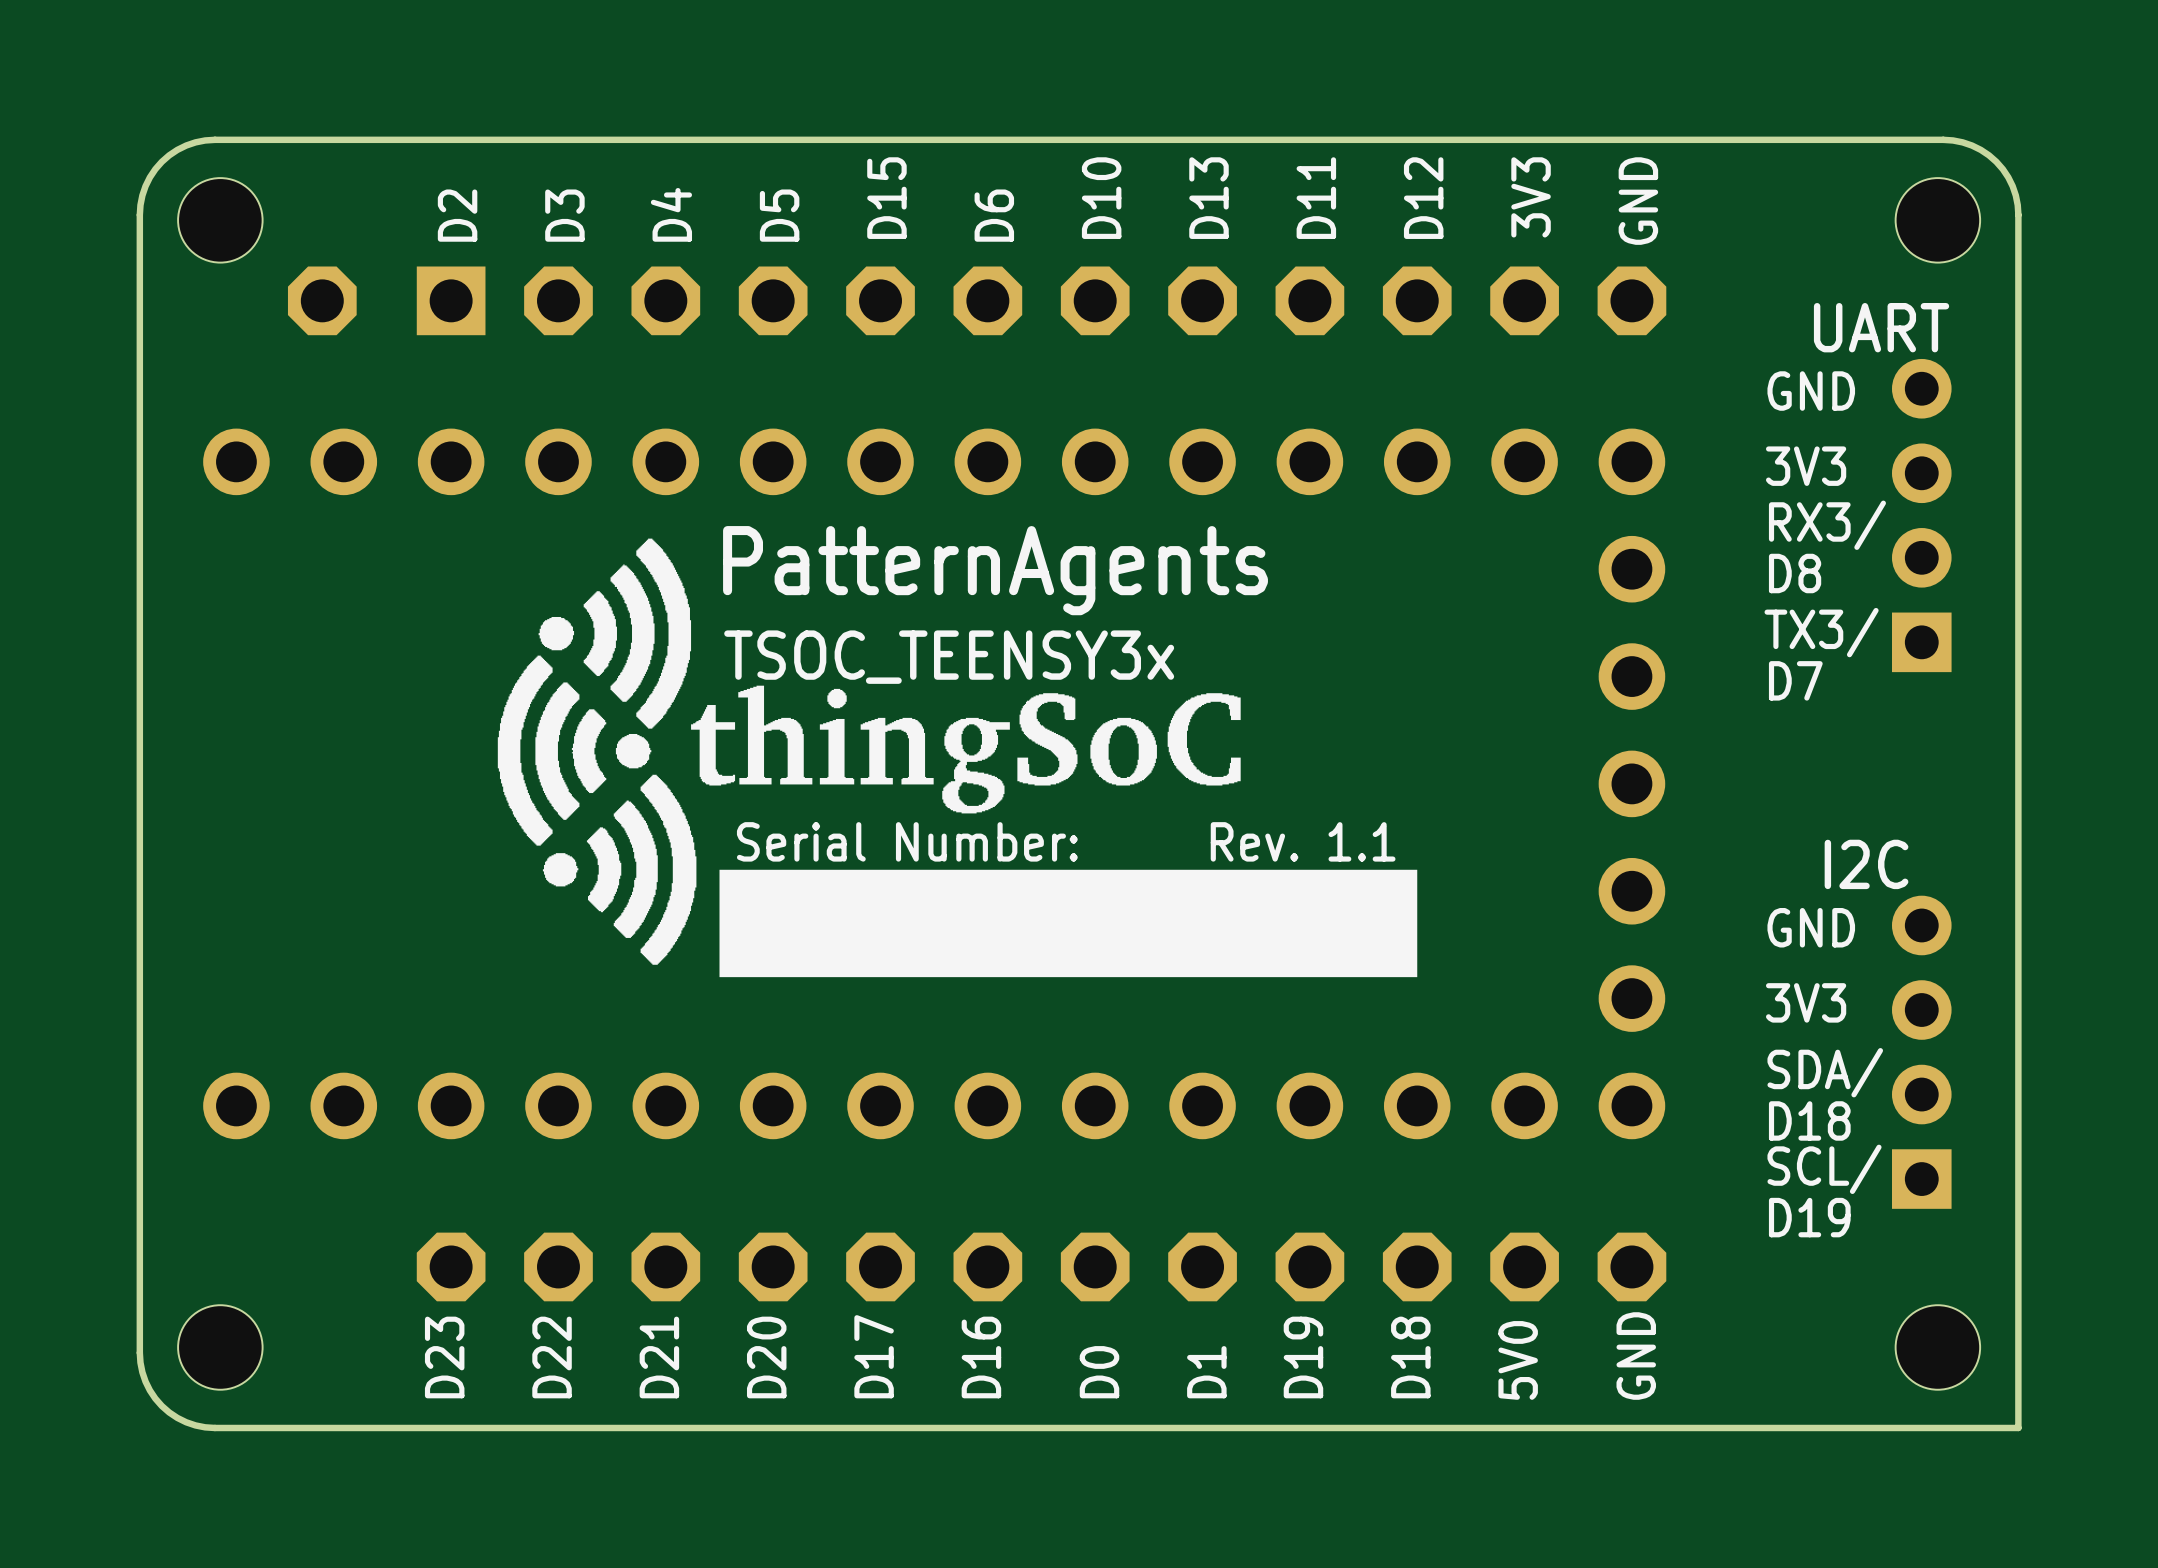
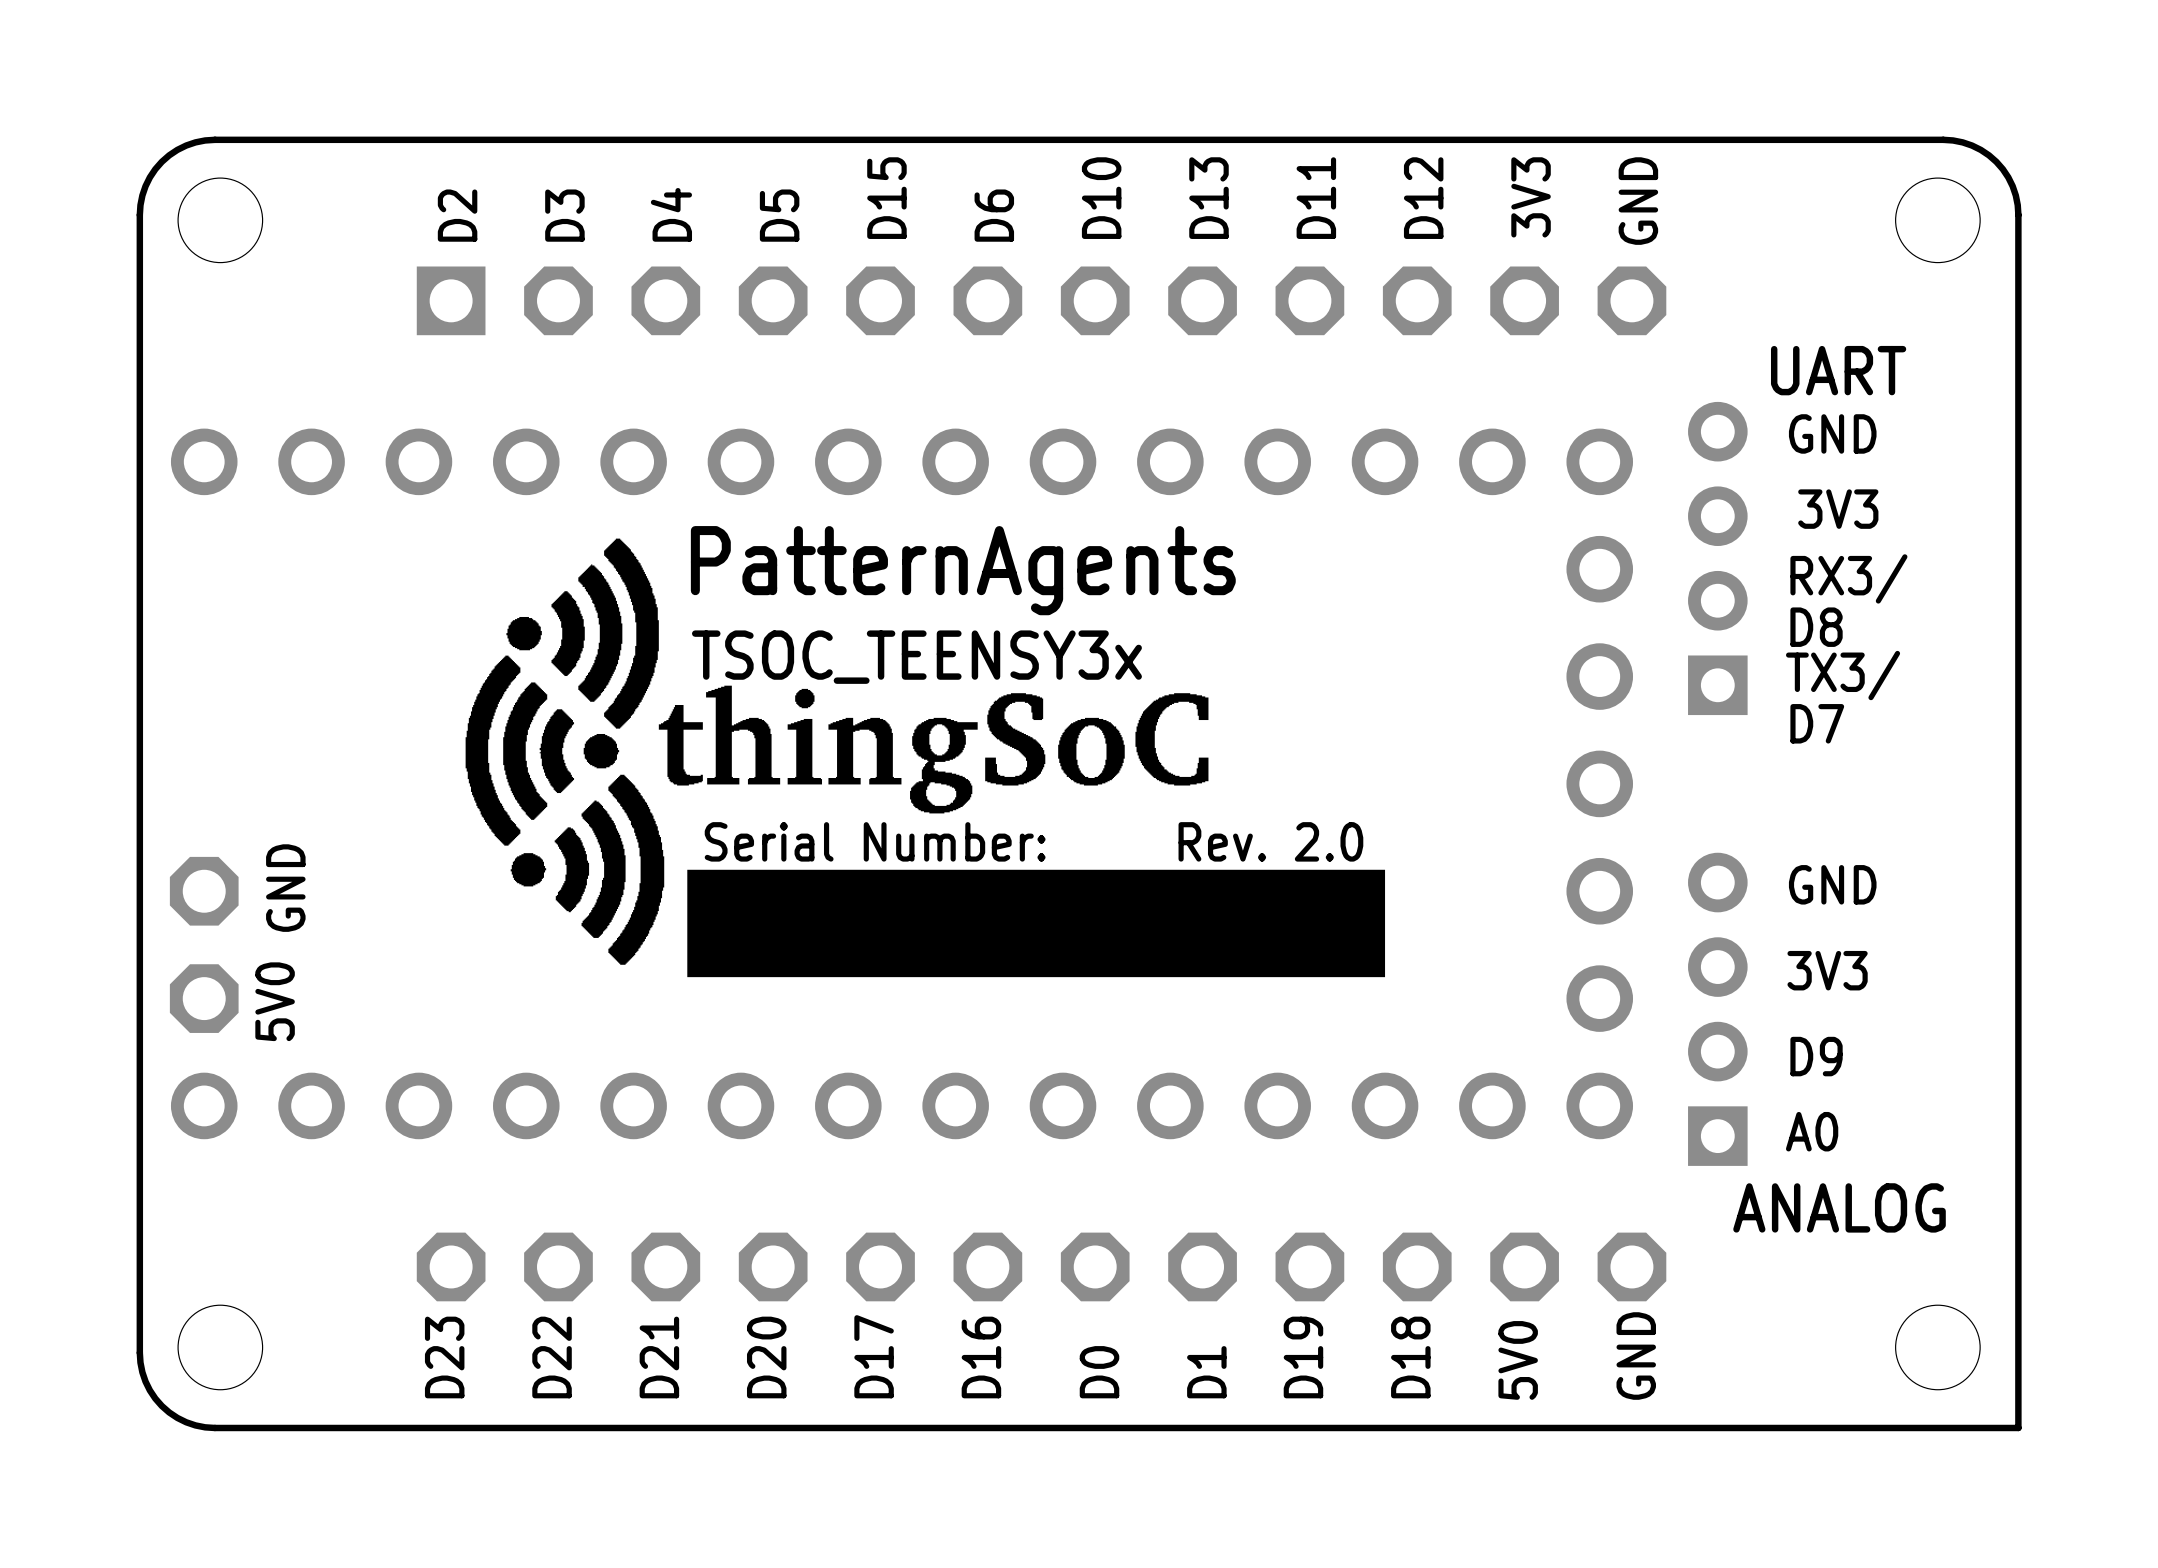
part: (322, 300) -> none
text position: UART (1881, 327) -> UART (1838, 370)
text position: GND (1811, 391) -> GND (1832, 433)
text position: 3V3 (1806, 466) -> 3V3 (1838, 509)
part position: (1921, 515) -> (1717, 558)
text position: RX3/ (1827, 525) -> RX3/ (1848, 578)
text position: PatternAgents (995, 570) -> PatternAgents (963, 570)
text position: D8 (1795, 573) -> D8 (1816, 627)
text position: TX3/ (1821, 632) -> TX3/ (1843, 675)
text position: TSOC_TEENSY3x (949, 657) -> TSOC_TEENSY3x (916, 657)
text position: D7 (1795, 680) -> D7 (1817, 723)
drawing position: (869, 751) -> (837, 751)
part position: (934, 783) -> (901, 783)
text position: Serial Number: (907, 841) -> Serial Number: (875, 841)
text: Rev. 1.1 (1303, 841) -> Rev. 2.0 (1270, 841)
text: I2C (1866, 864) -> none
text: none -> GND (285, 888)
part: none -> (204, 891)
drawing position: (1068, 923) -> (1036, 923)
text position: GND (1811, 927) -> GND (1832, 884)
part: none -> (204, 998)
text: none -> 5V0 (275, 1001)
text position: 3V3 (1806, 1002) -> 3V3 (1827, 970)
part position: (1921, 1052) -> (1717, 1009)
text: SDA/ (1825, 1072) -> D9 (1816, 1056)
text: D18 (1809, 1120) -> none
text: none -> A0 (1812, 1131)
text: SCL/ (1824, 1169) -> none
text: none -> ANALOG (1839, 1207)
text: D19 (1809, 1217) -> none

